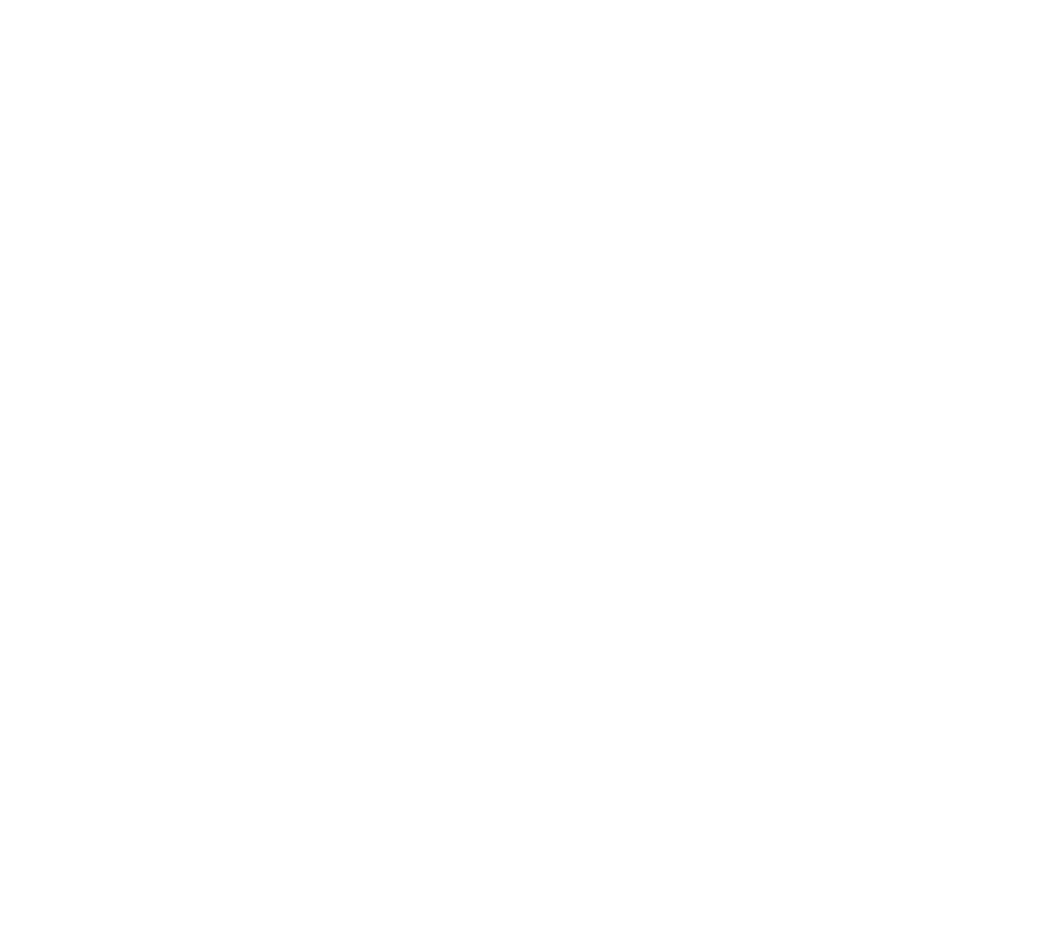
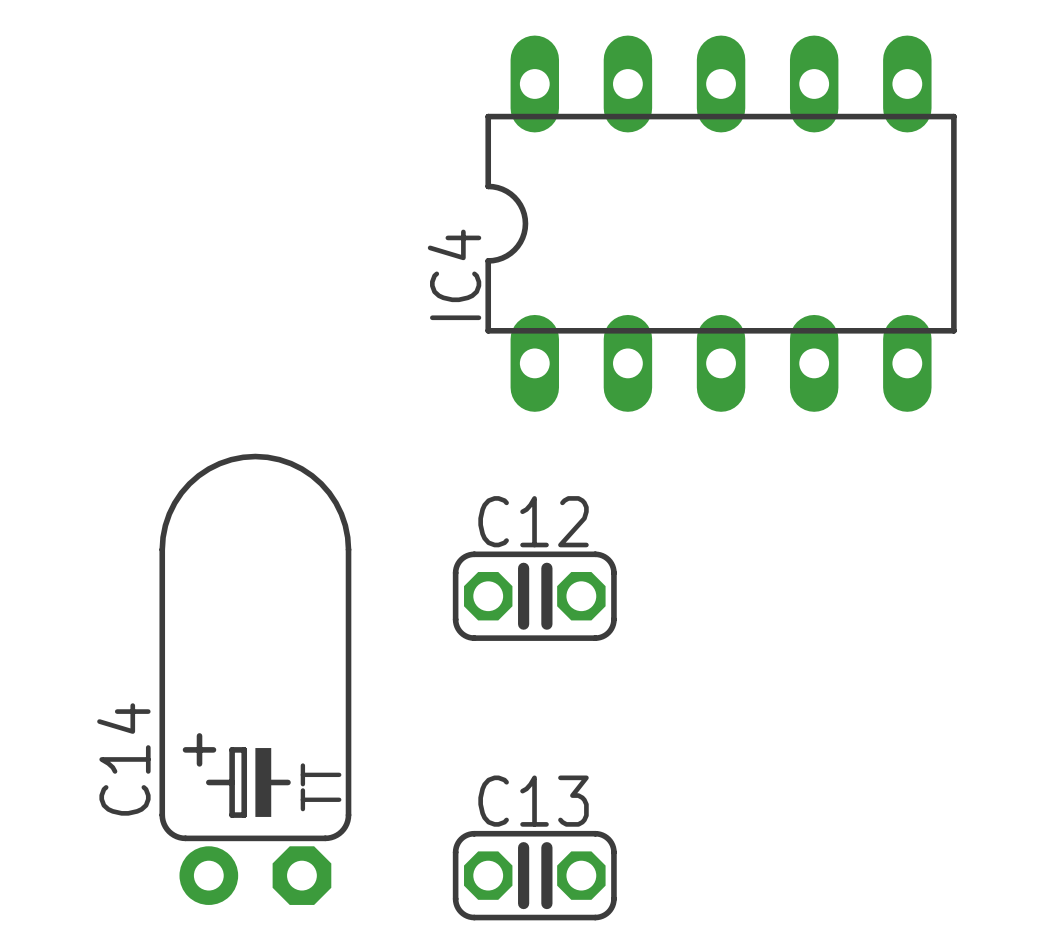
IC4: none -> (721, 223)
C12: none -> (534, 596)
C14: none -> (255, 679)
C13: none -> (534, 875)

